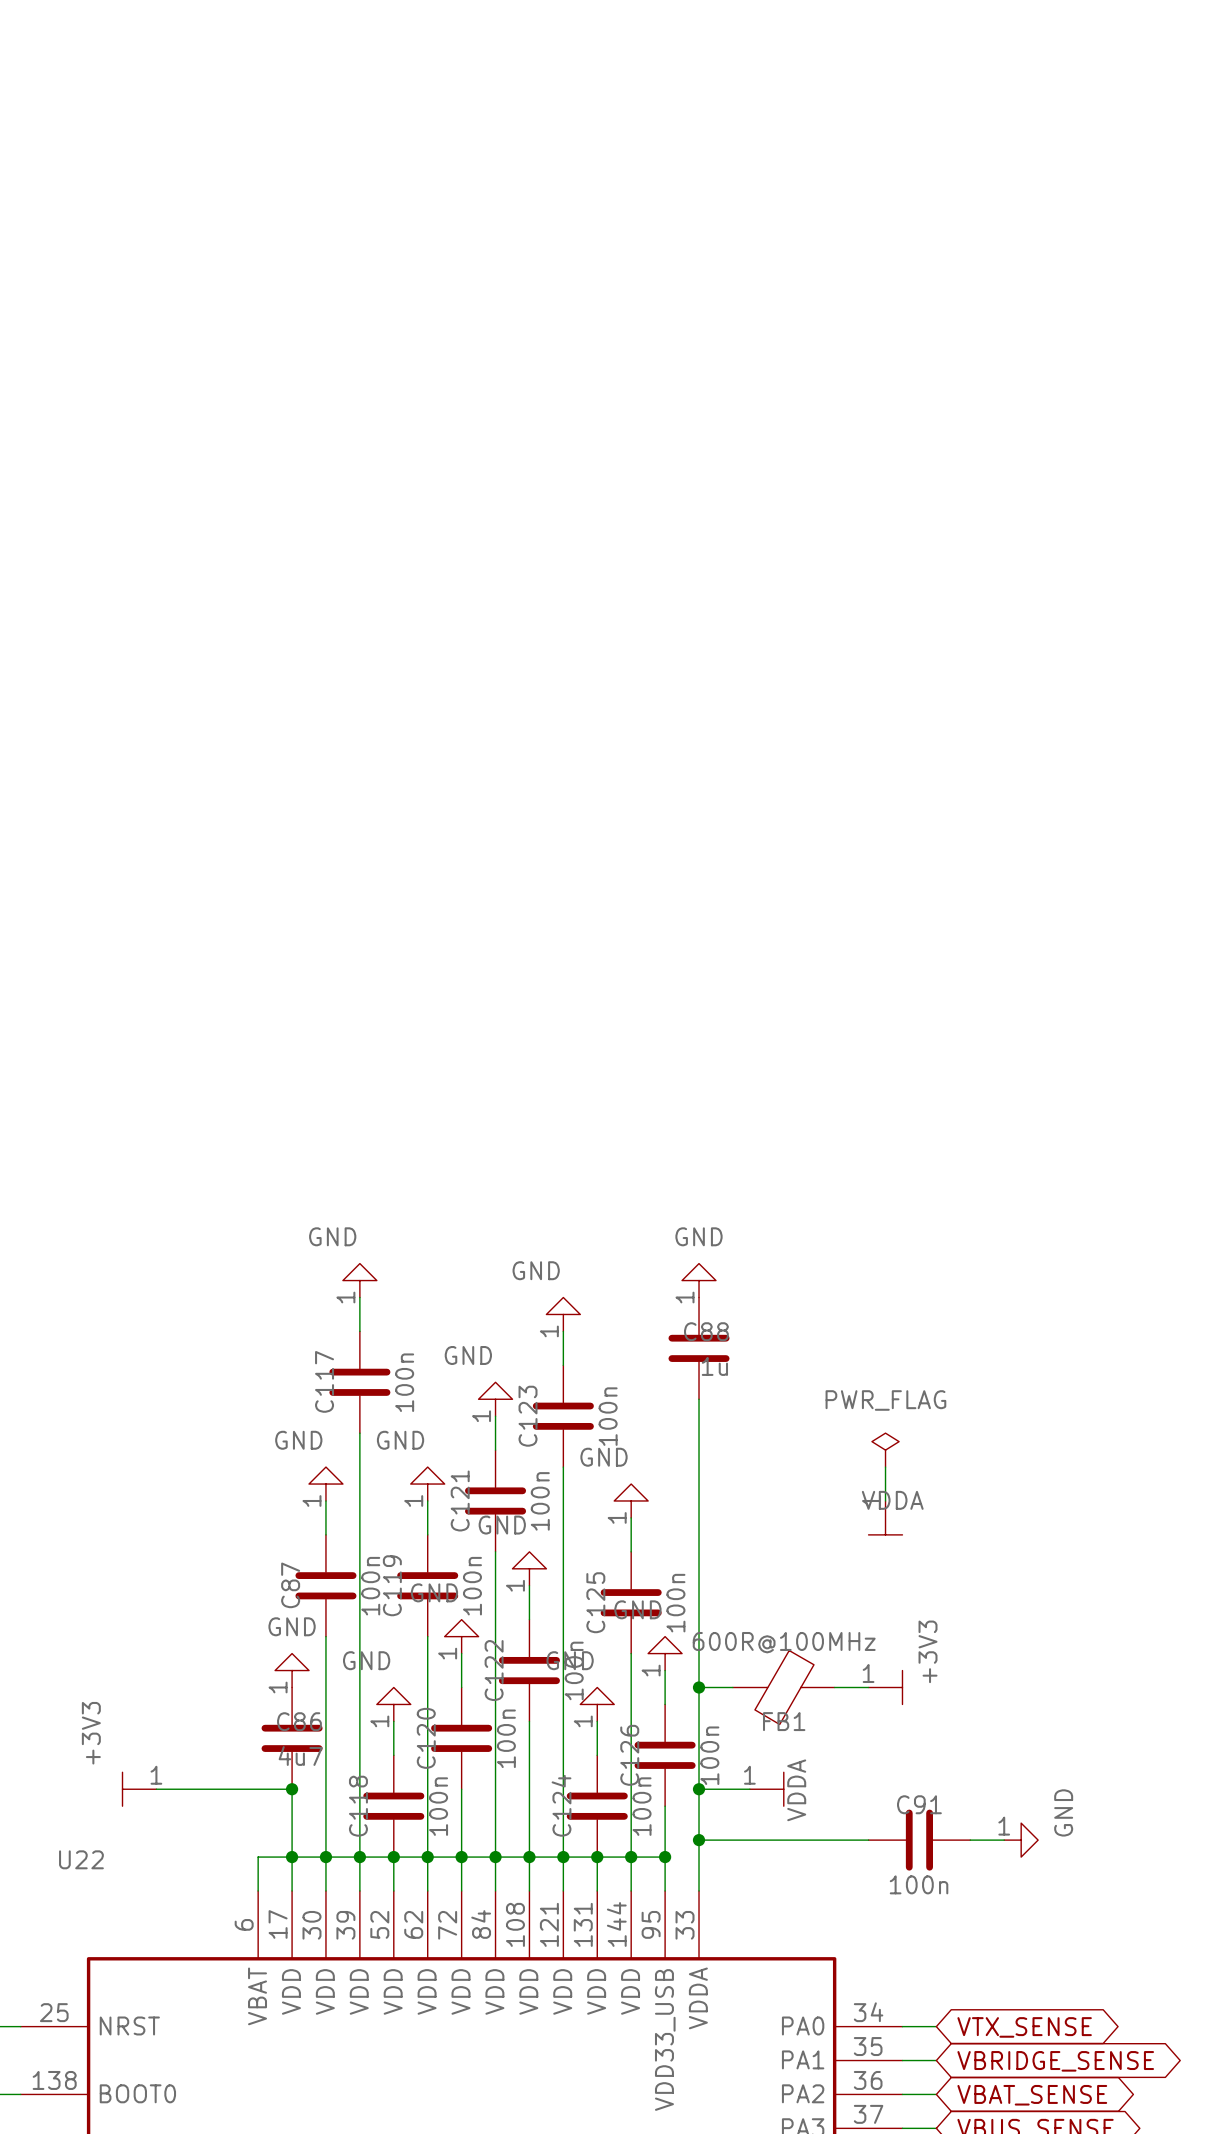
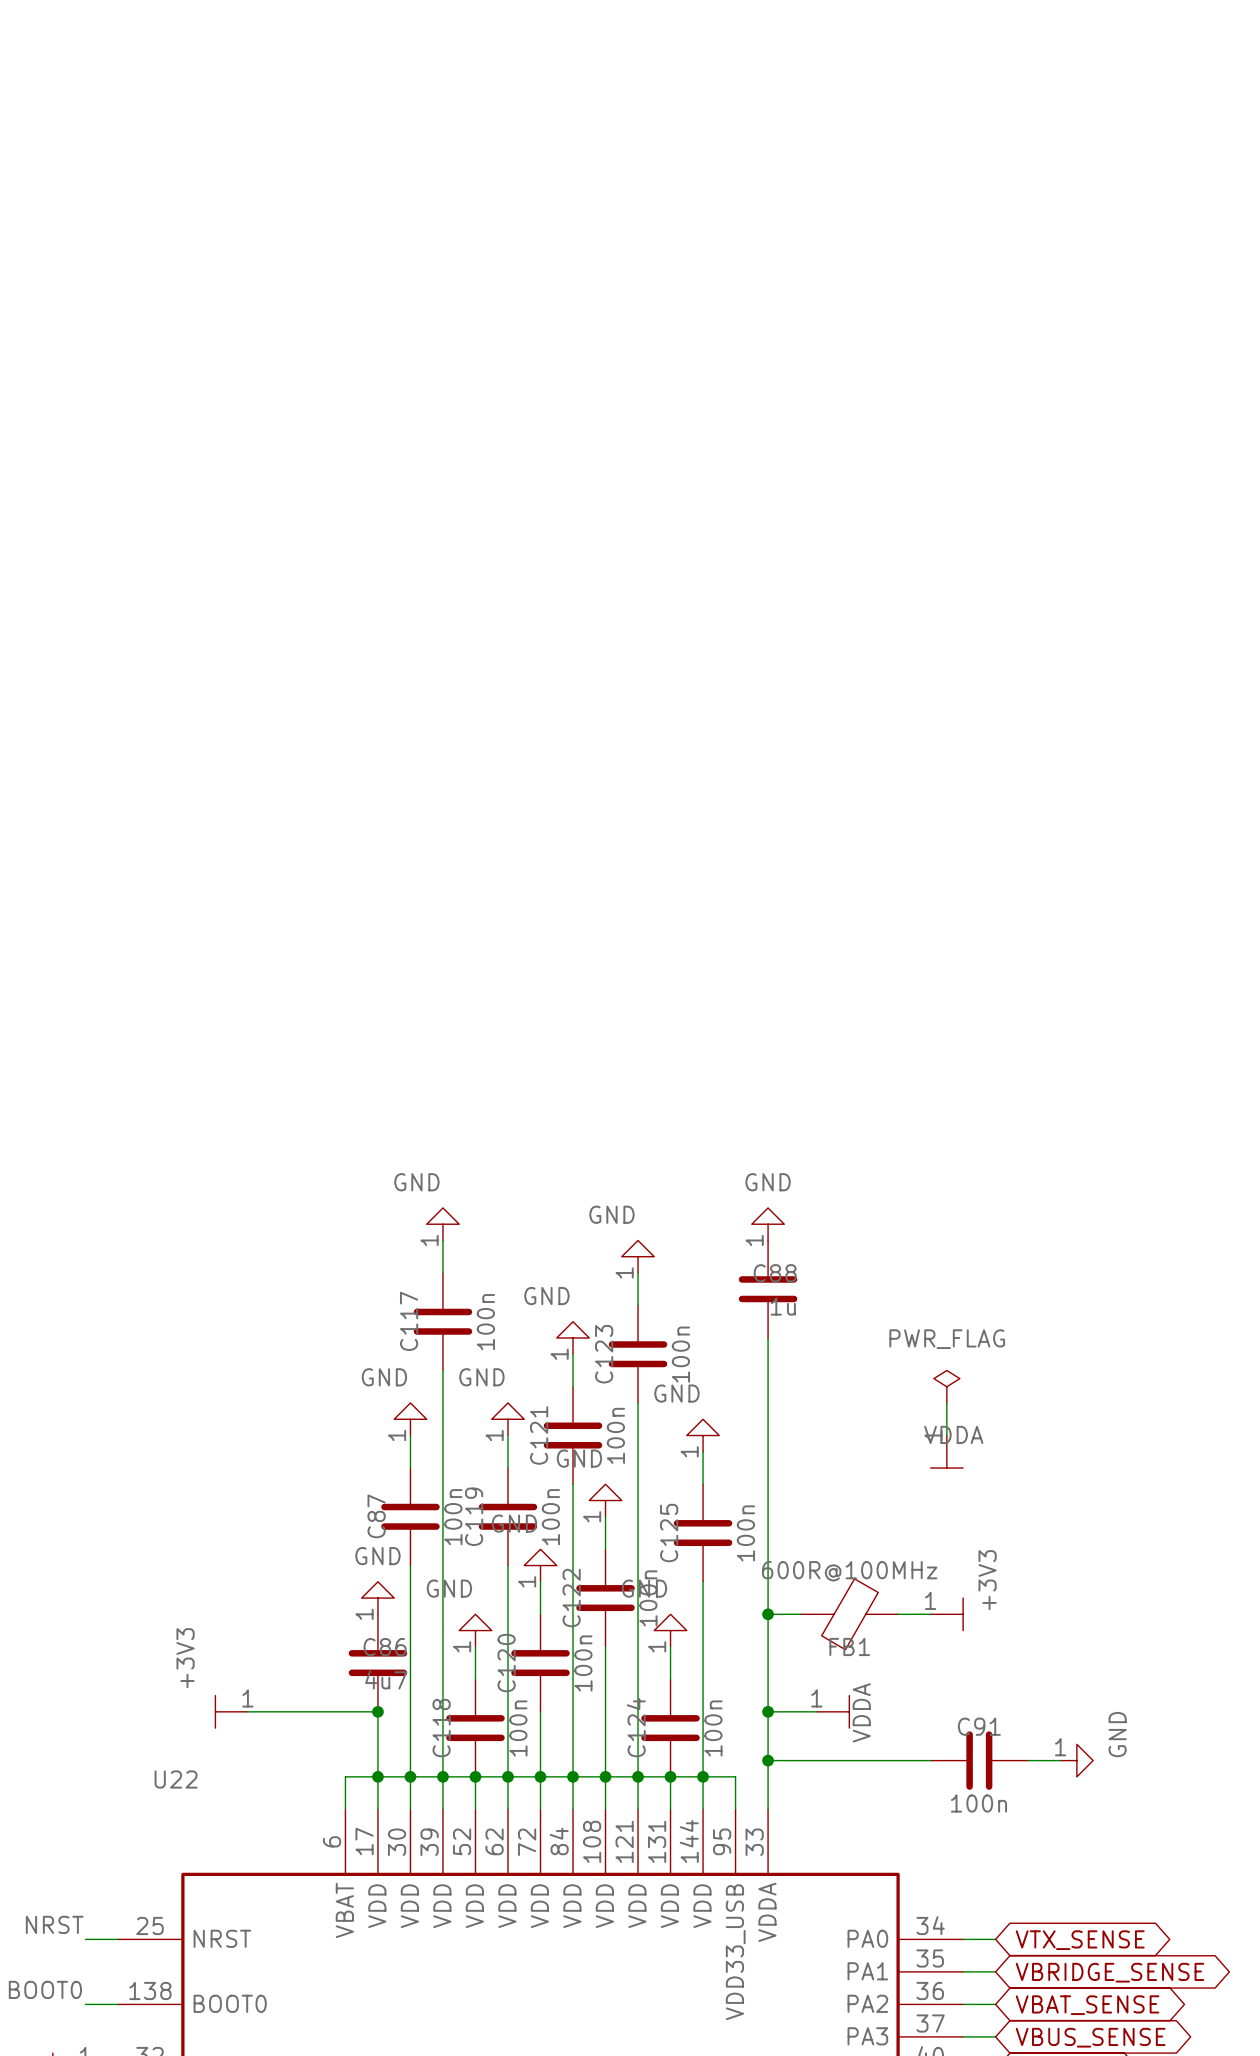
power symbol: GND (665, 1653) -> none
wire: (665, 1670) (665, 1704) -> none
C126: 100n (665, 1755) -> none
wire: (665, 1806) (665, 1857) -> none
junction: (665, 1857) -> none

